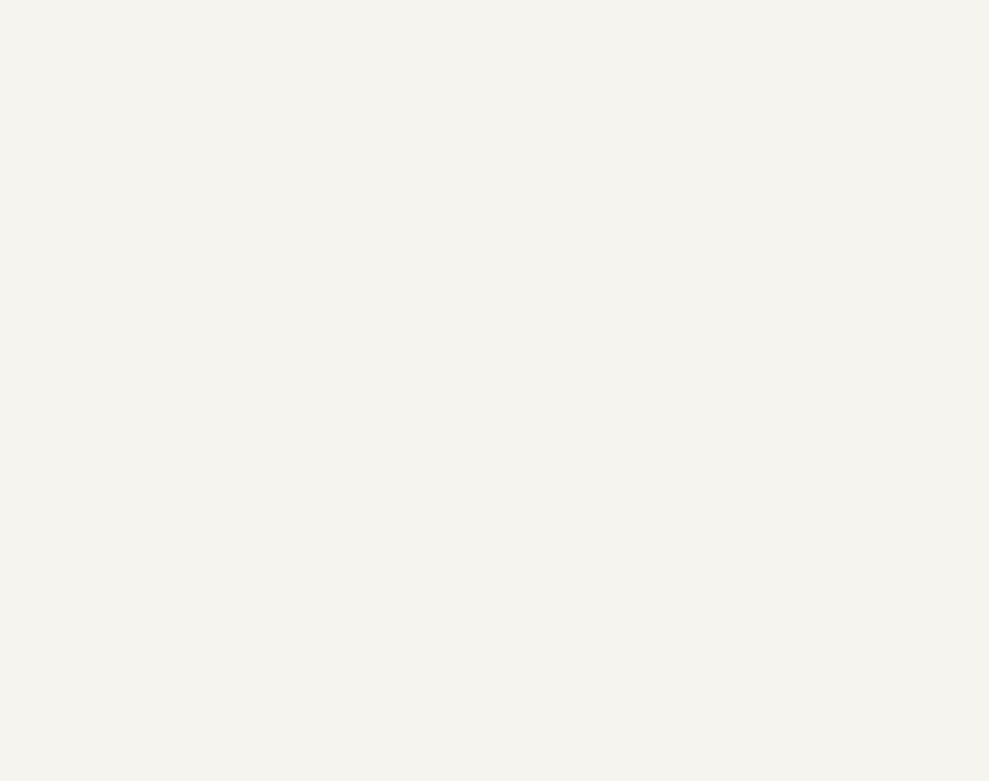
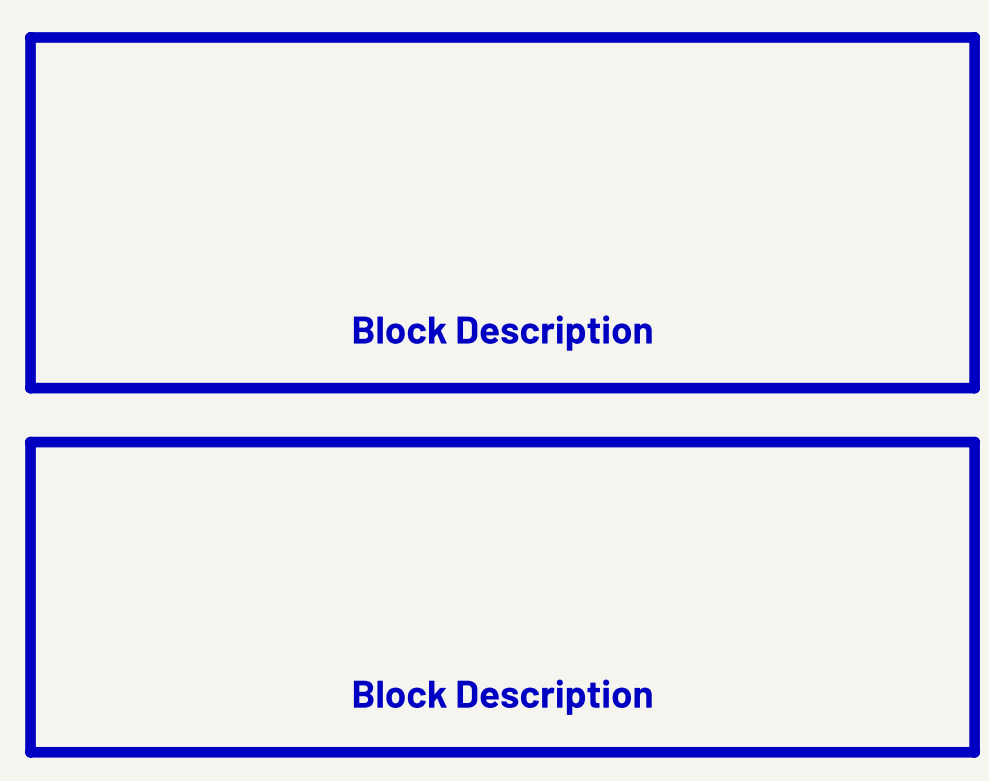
line: none -> (30, 37) (30, 388) (974, 388) (974, 37) (30, 37)
text: none -> Block Description (502, 333)
line: none -> (30, 442) (974, 442) (974, 752) (30, 752) (30, 442)
text: none -> Block Description (502, 697)

